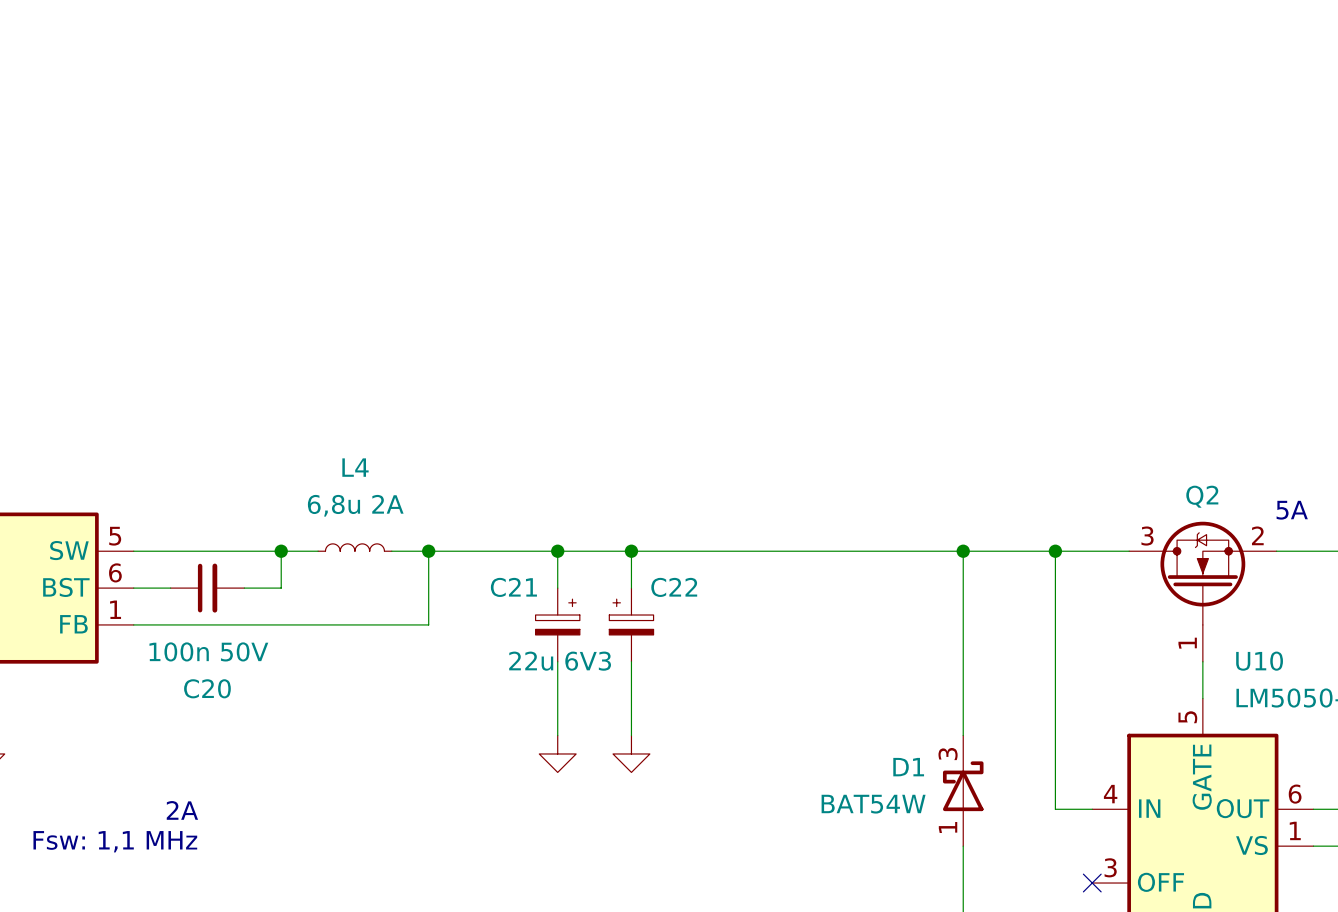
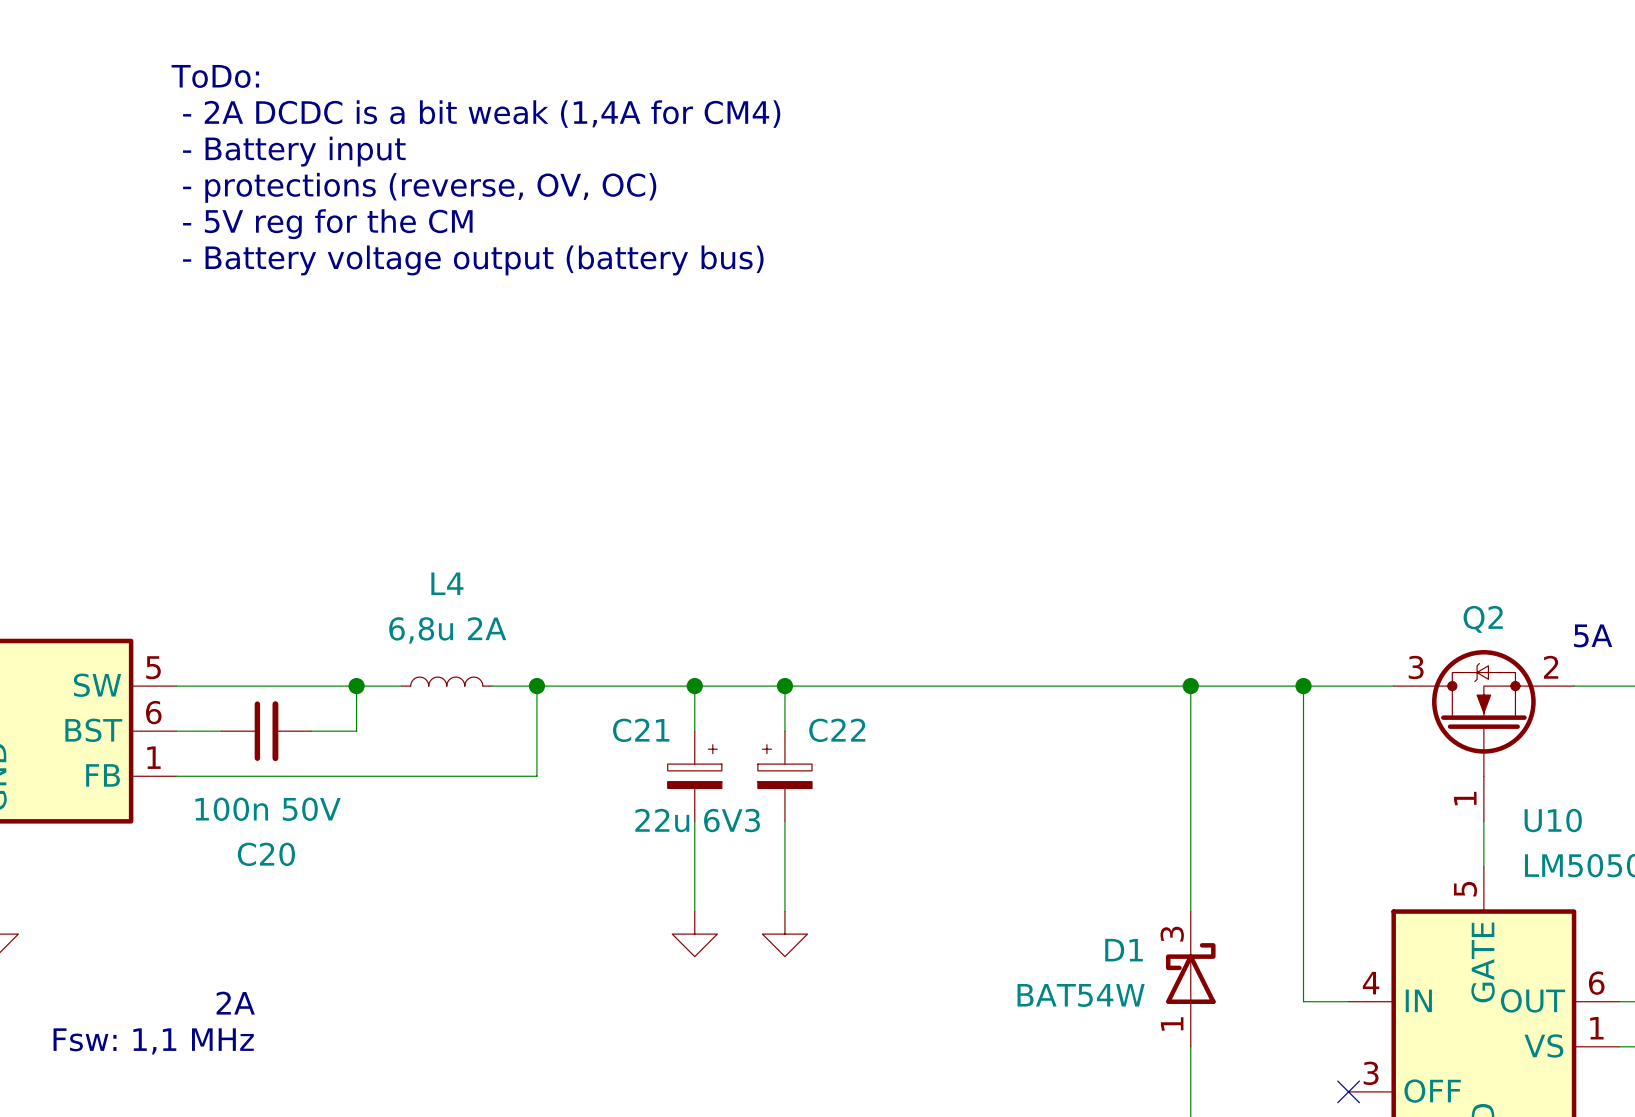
text: none -> ToDo: (215, 76)
text: none -> - 2A DCDC is a bit weak (1,4A for CM4) (481, 114)
text: none -> - Battery input (294, 151)
text: none -> - protections (reverse, OV, OC) (419, 187)
text: none -> - 5V reg for the CM (327, 224)
text: none -> - Battery voltage output (battery bus) (473, 260)

